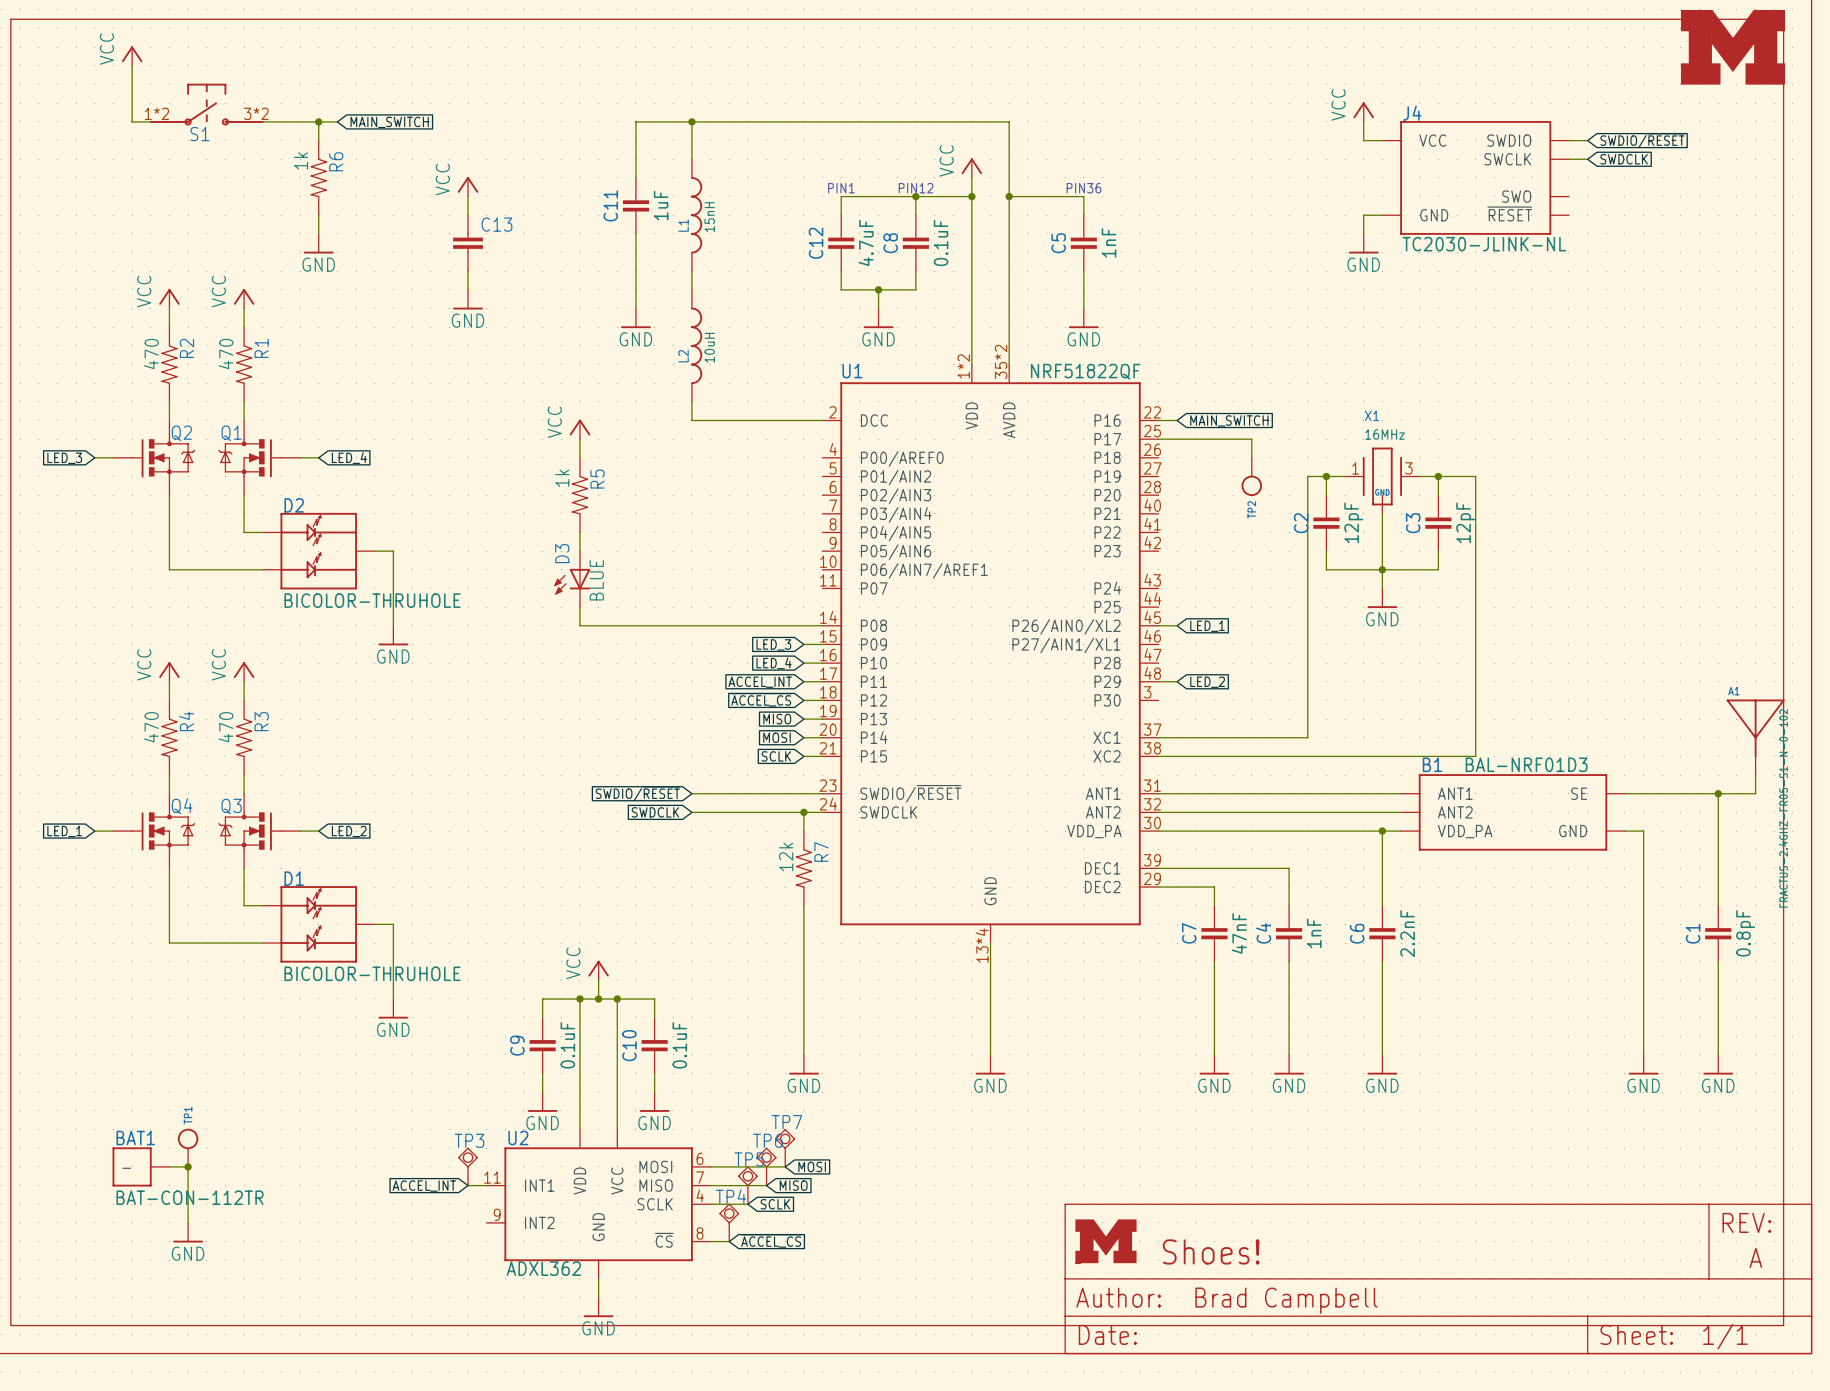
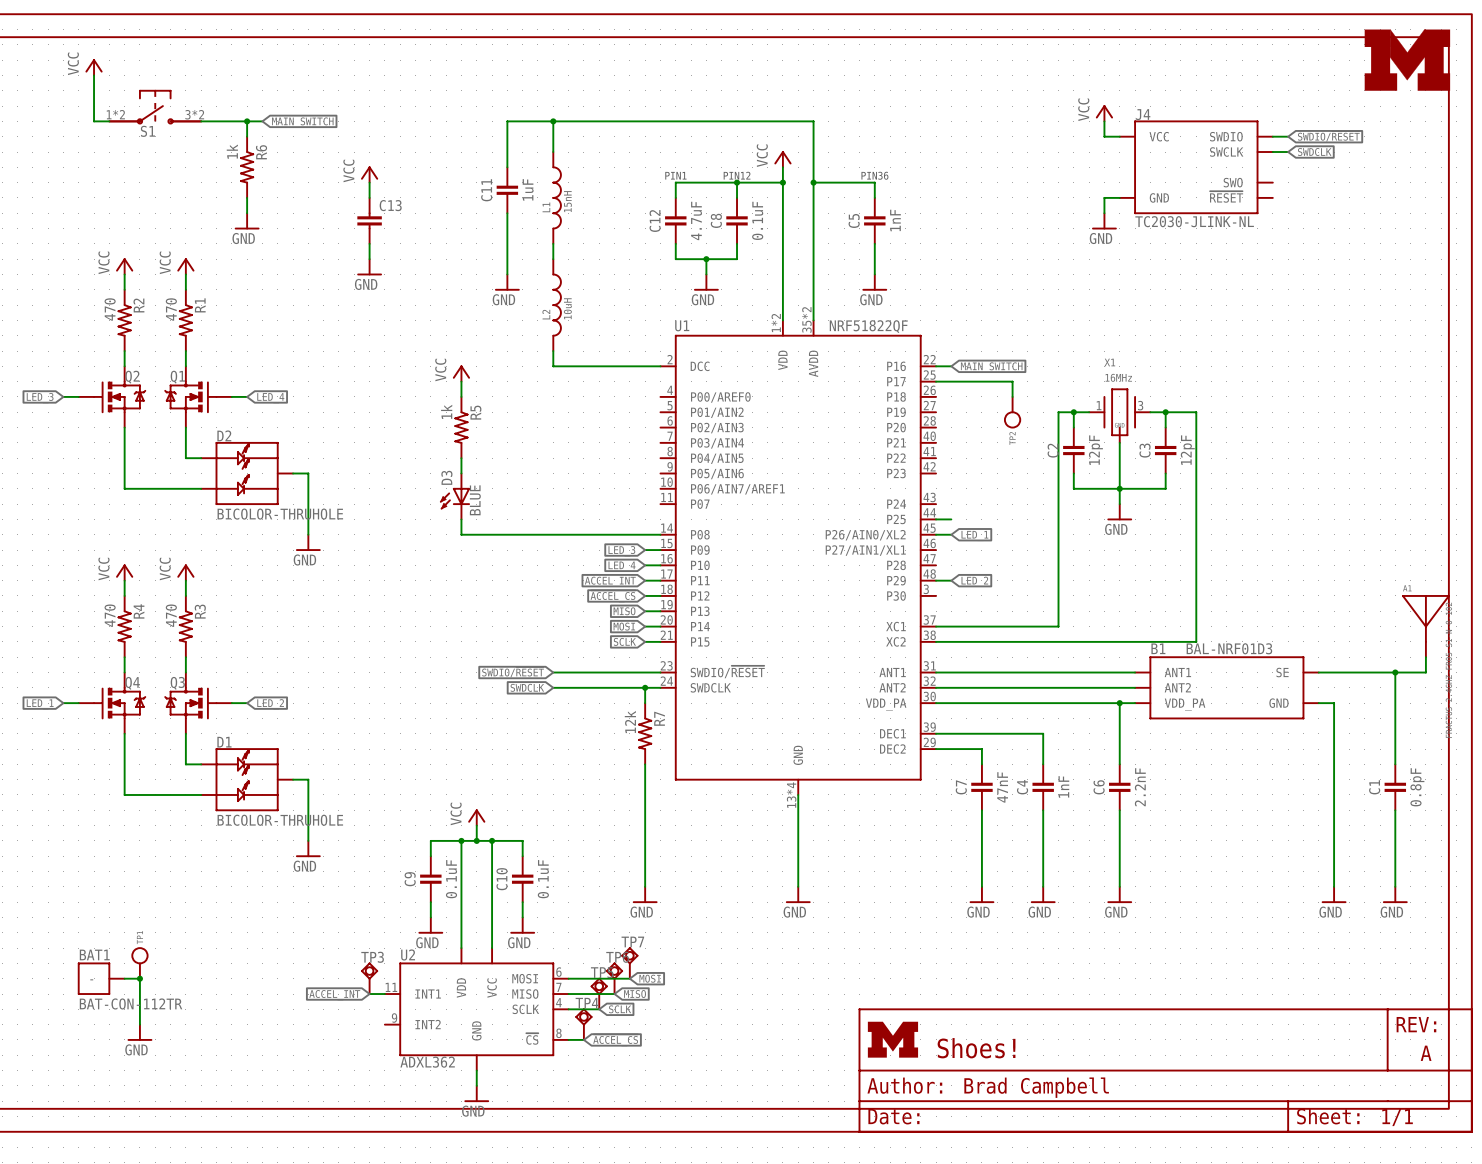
wire: none -> (936, 519) (951, 519)

